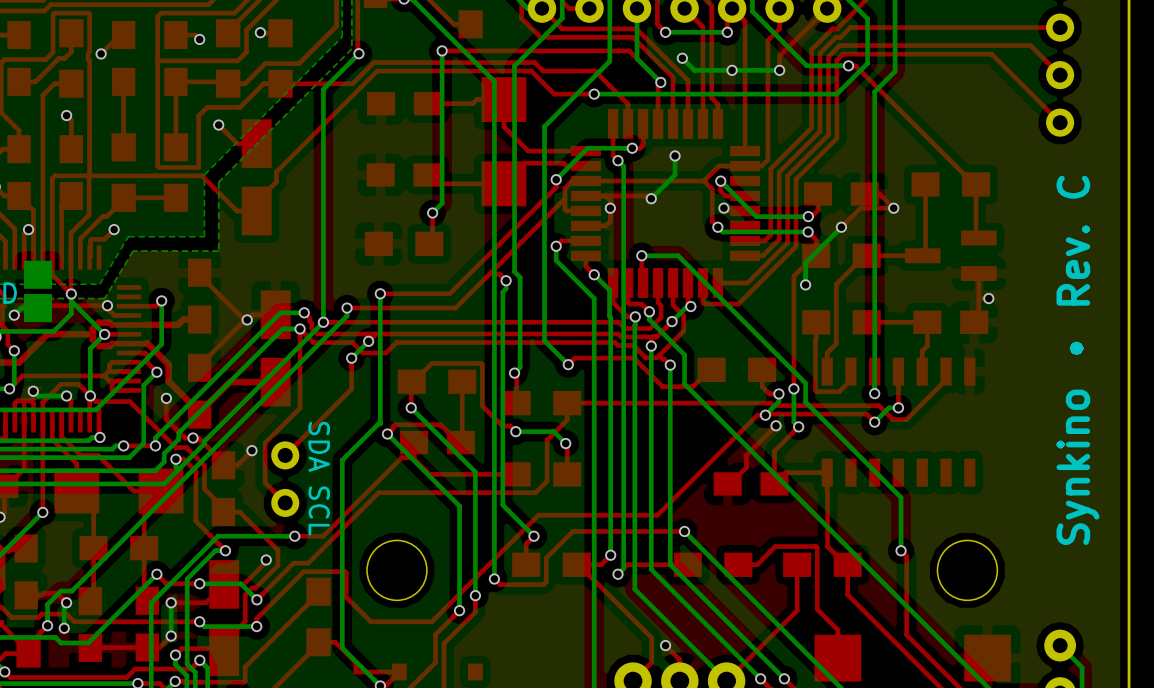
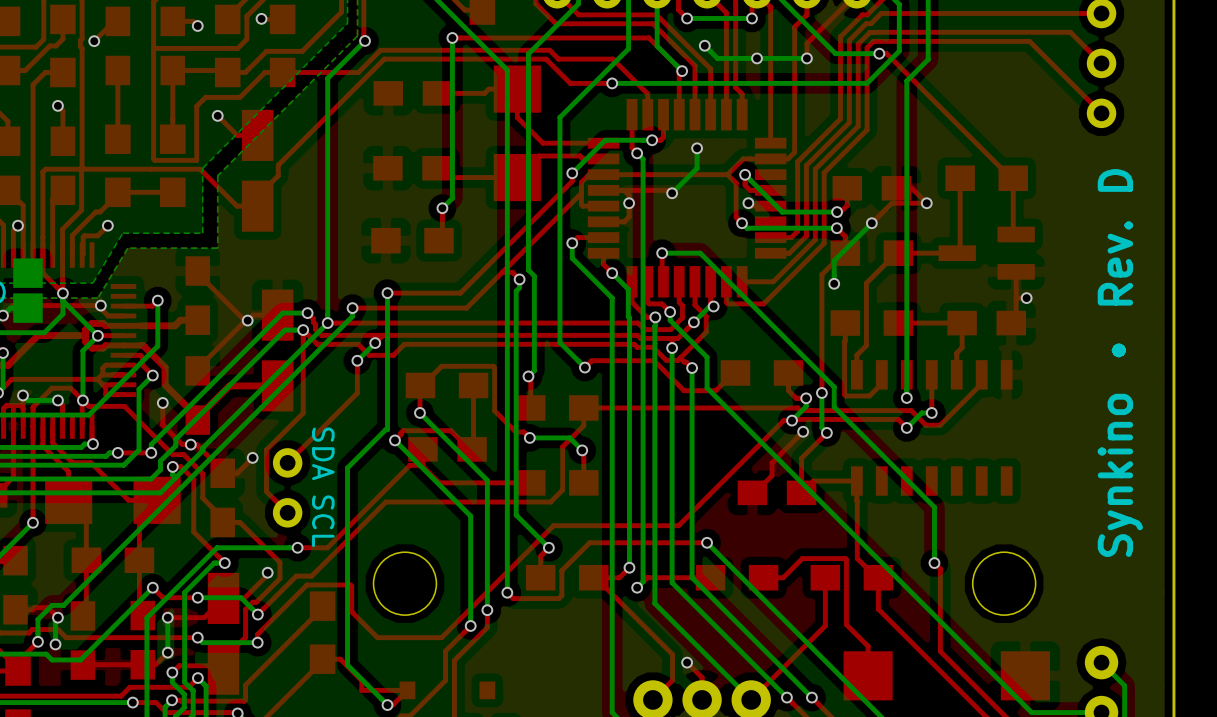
text: Synkino • Rev. C (1078, 360) -> Synkino • Rev. D (1120, 363)

